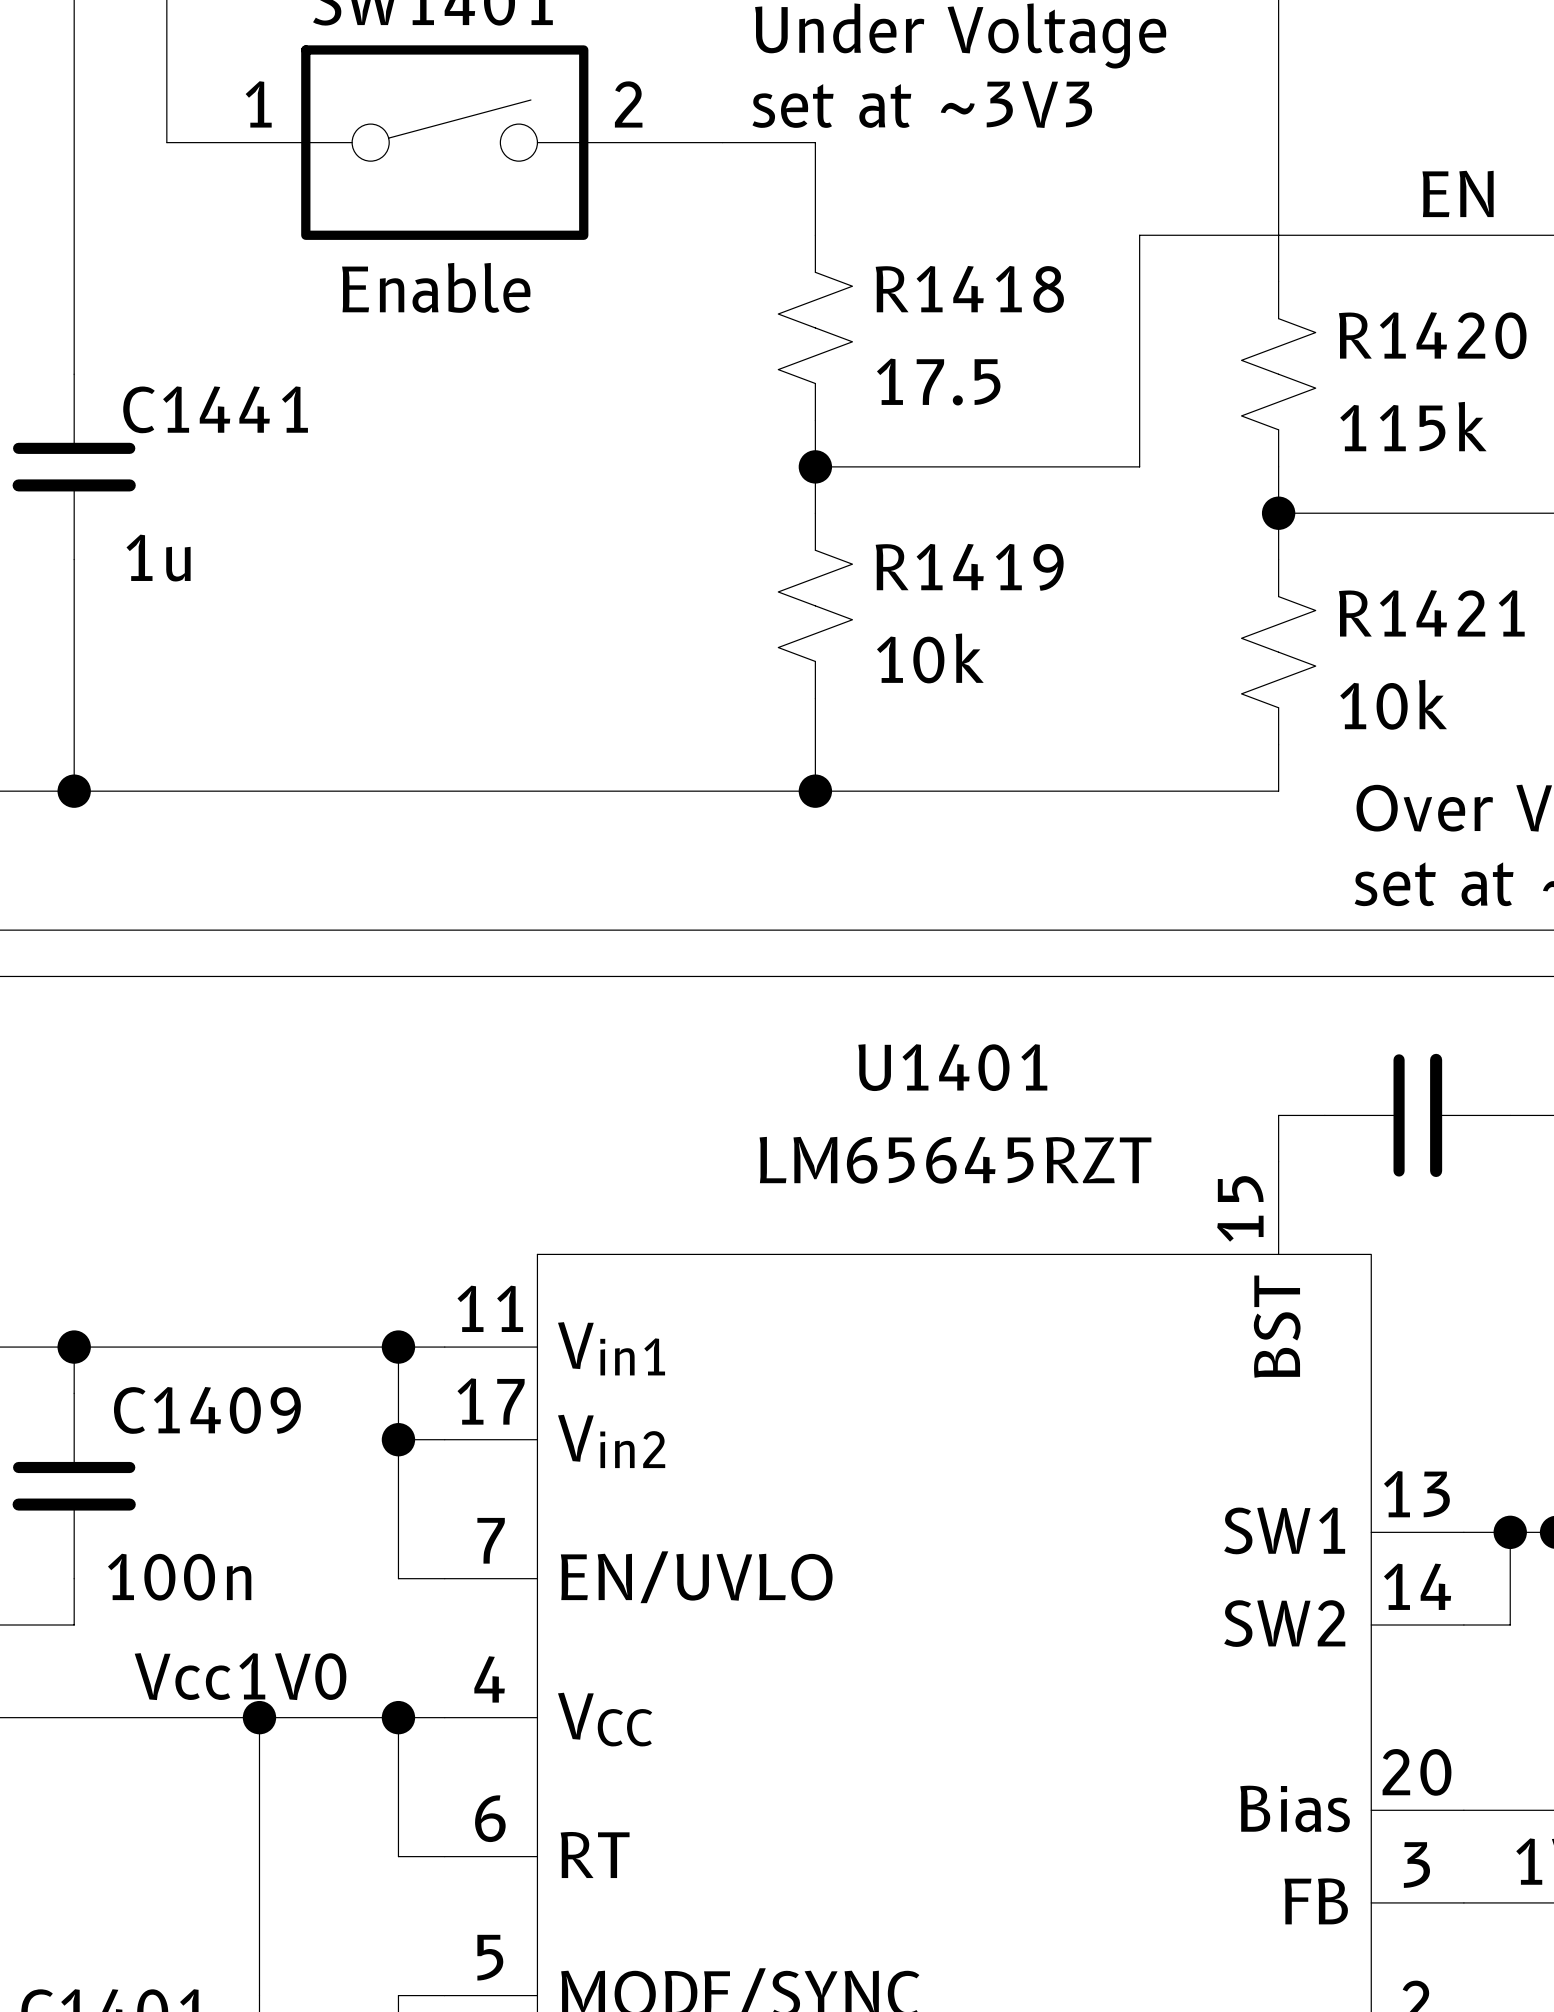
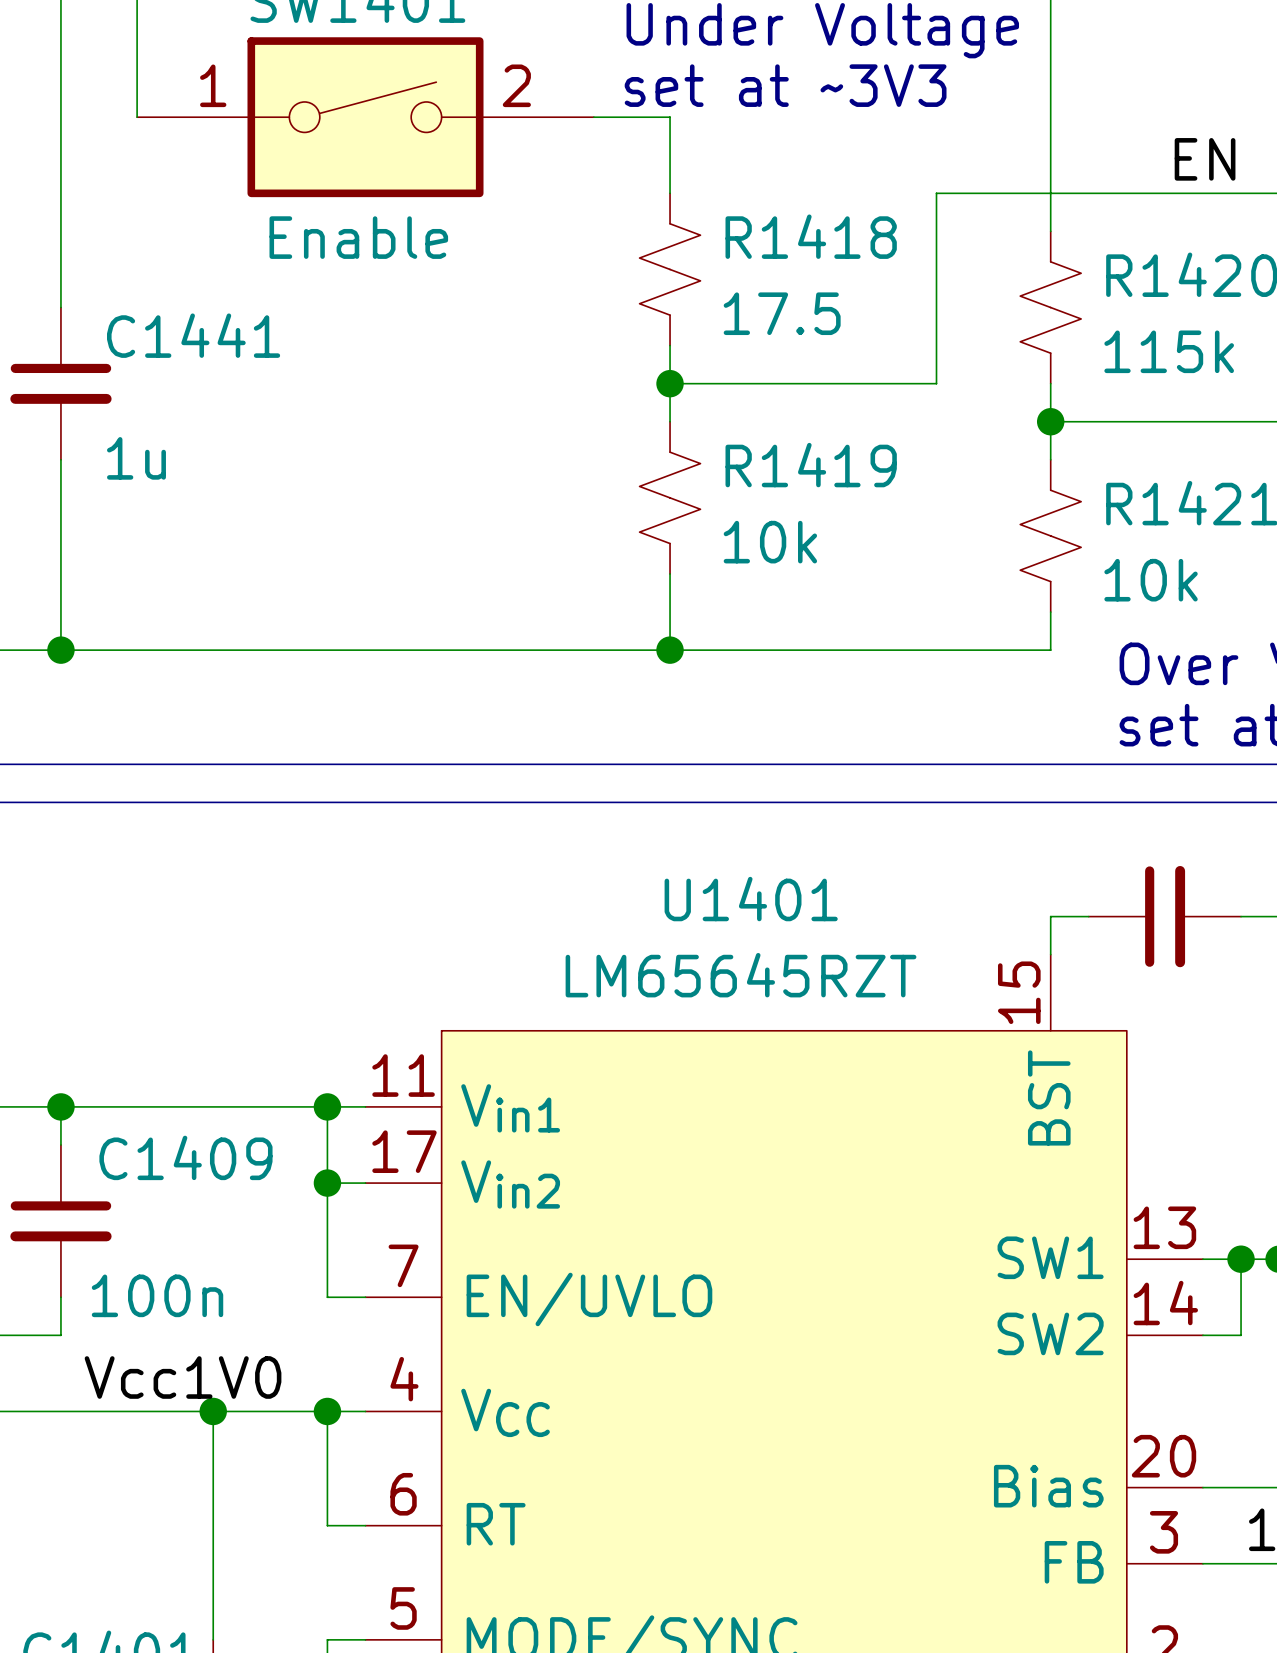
U1401 name position: U1401 (952, 1067) -> U1401 (751, 899)
U1401 value position: LM65645RZT (955, 1160) -> LM65645RZT (741, 975)

